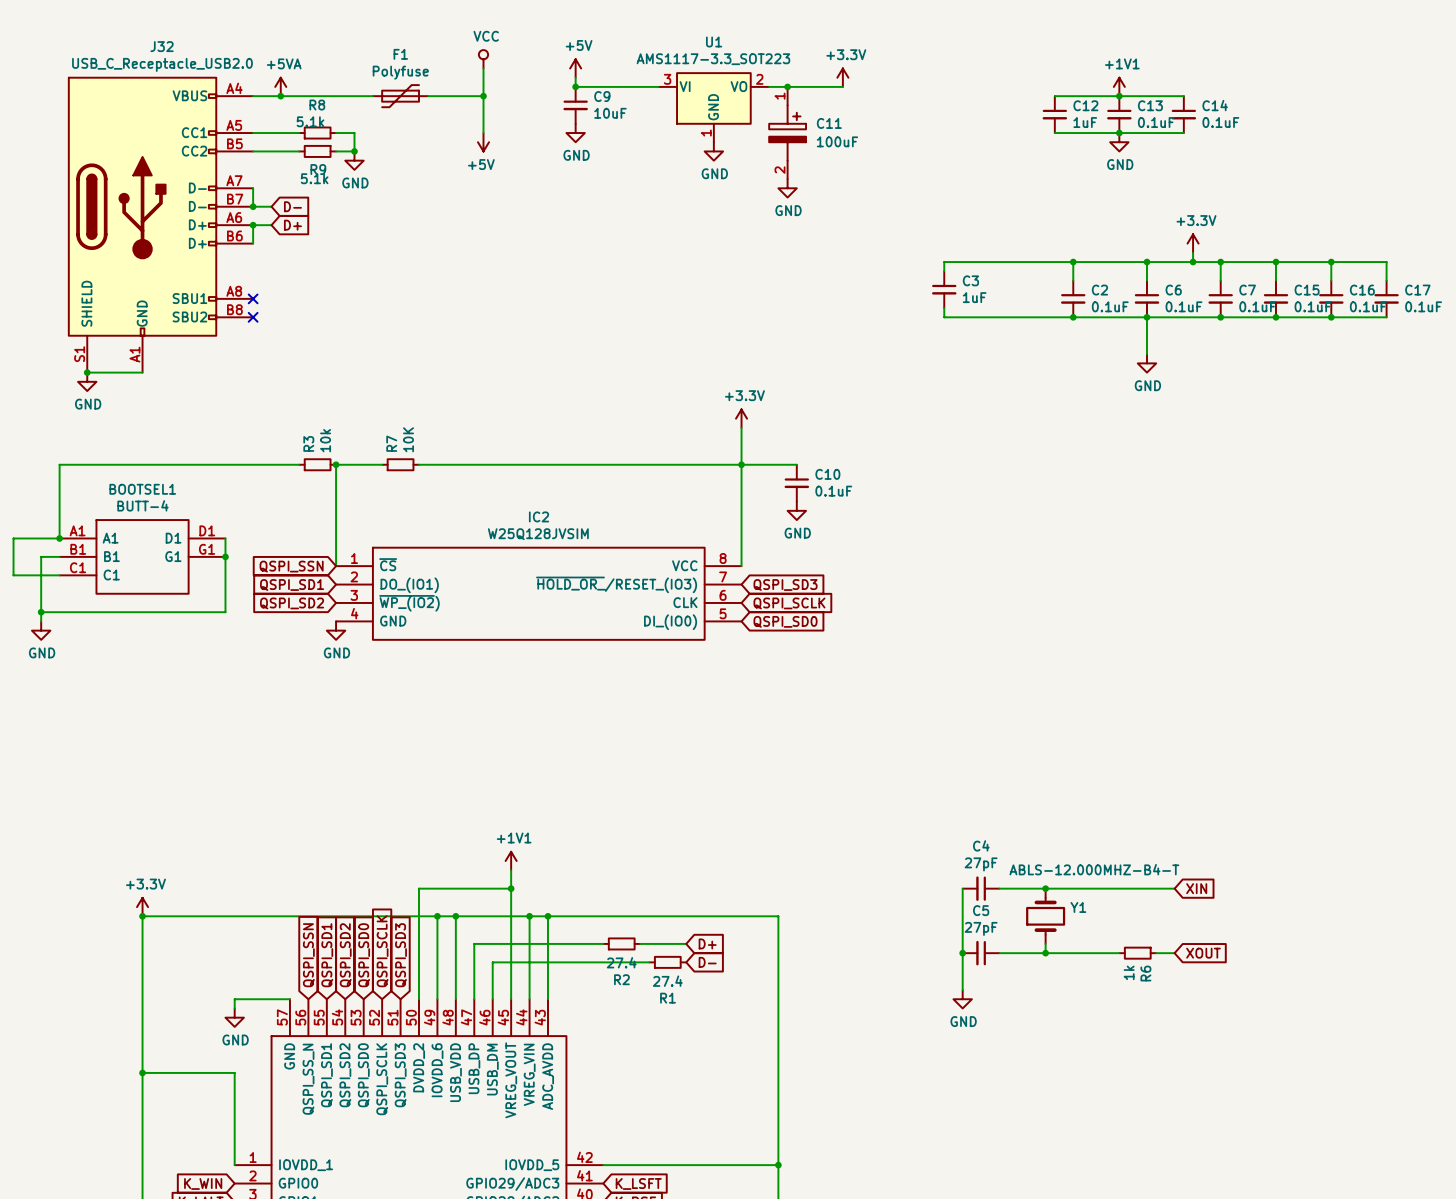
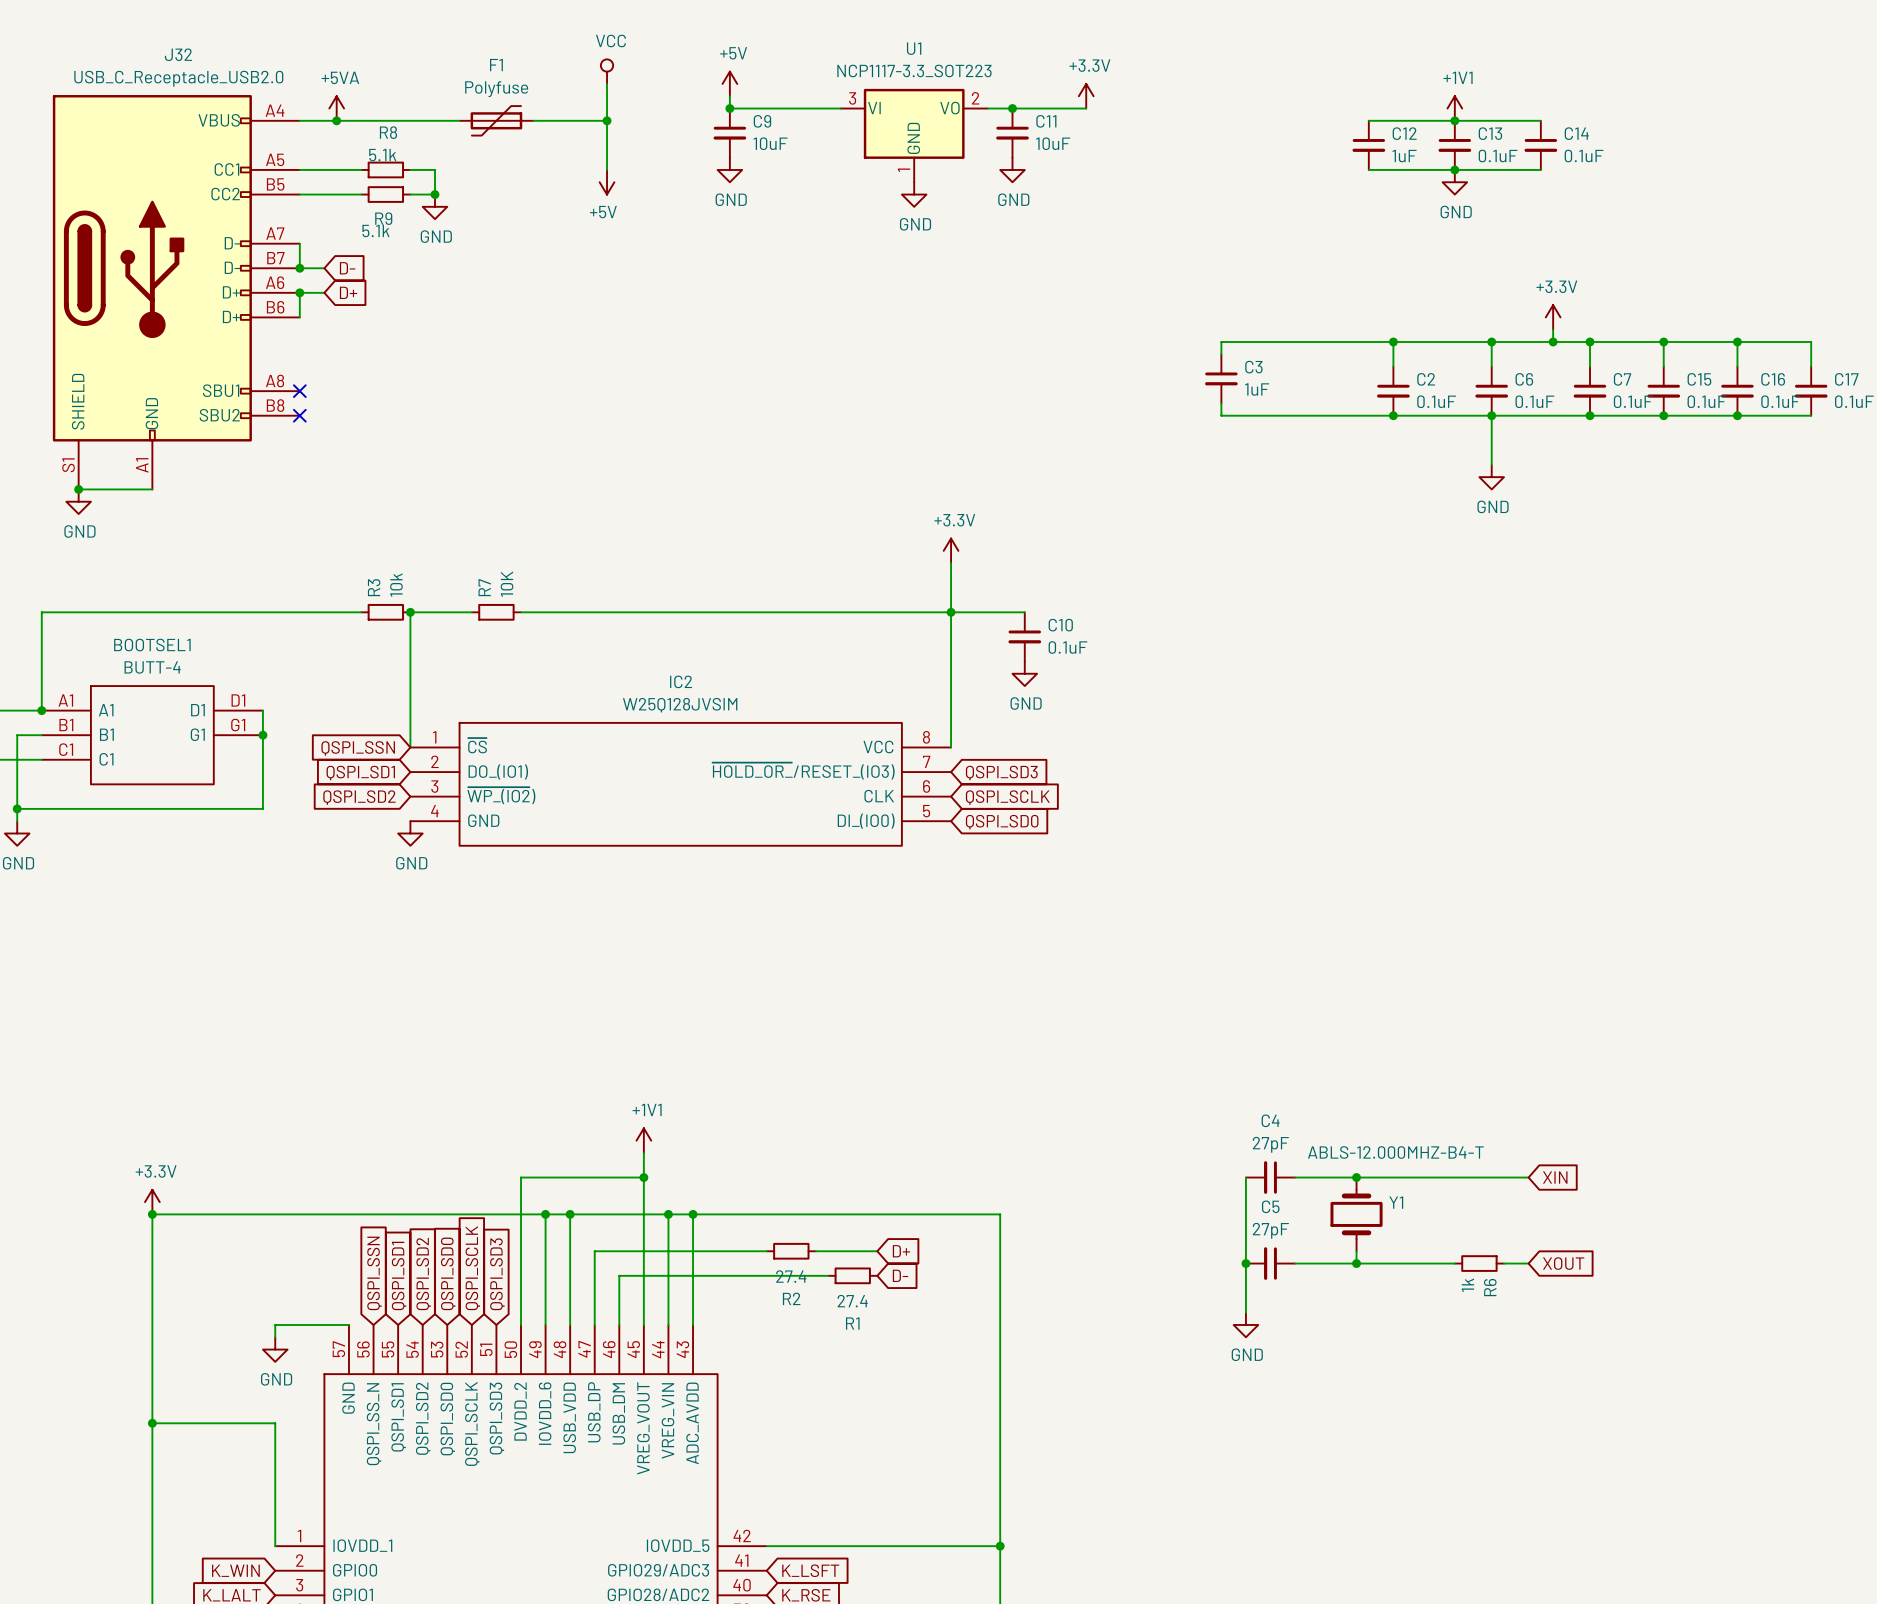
U1 value: AMS1117-3.3_SOT223 (713, 59) -> NCP1117-3.3_SOT223 (914, 70)
C11 symbol: [768, 86, 807, 180] -> [996, 108, 1029, 158]
C11 value: 100uF (837, 141) -> 10uF (1053, 143)
power symbol position: GND (787, 188) -> GND (1012, 169)

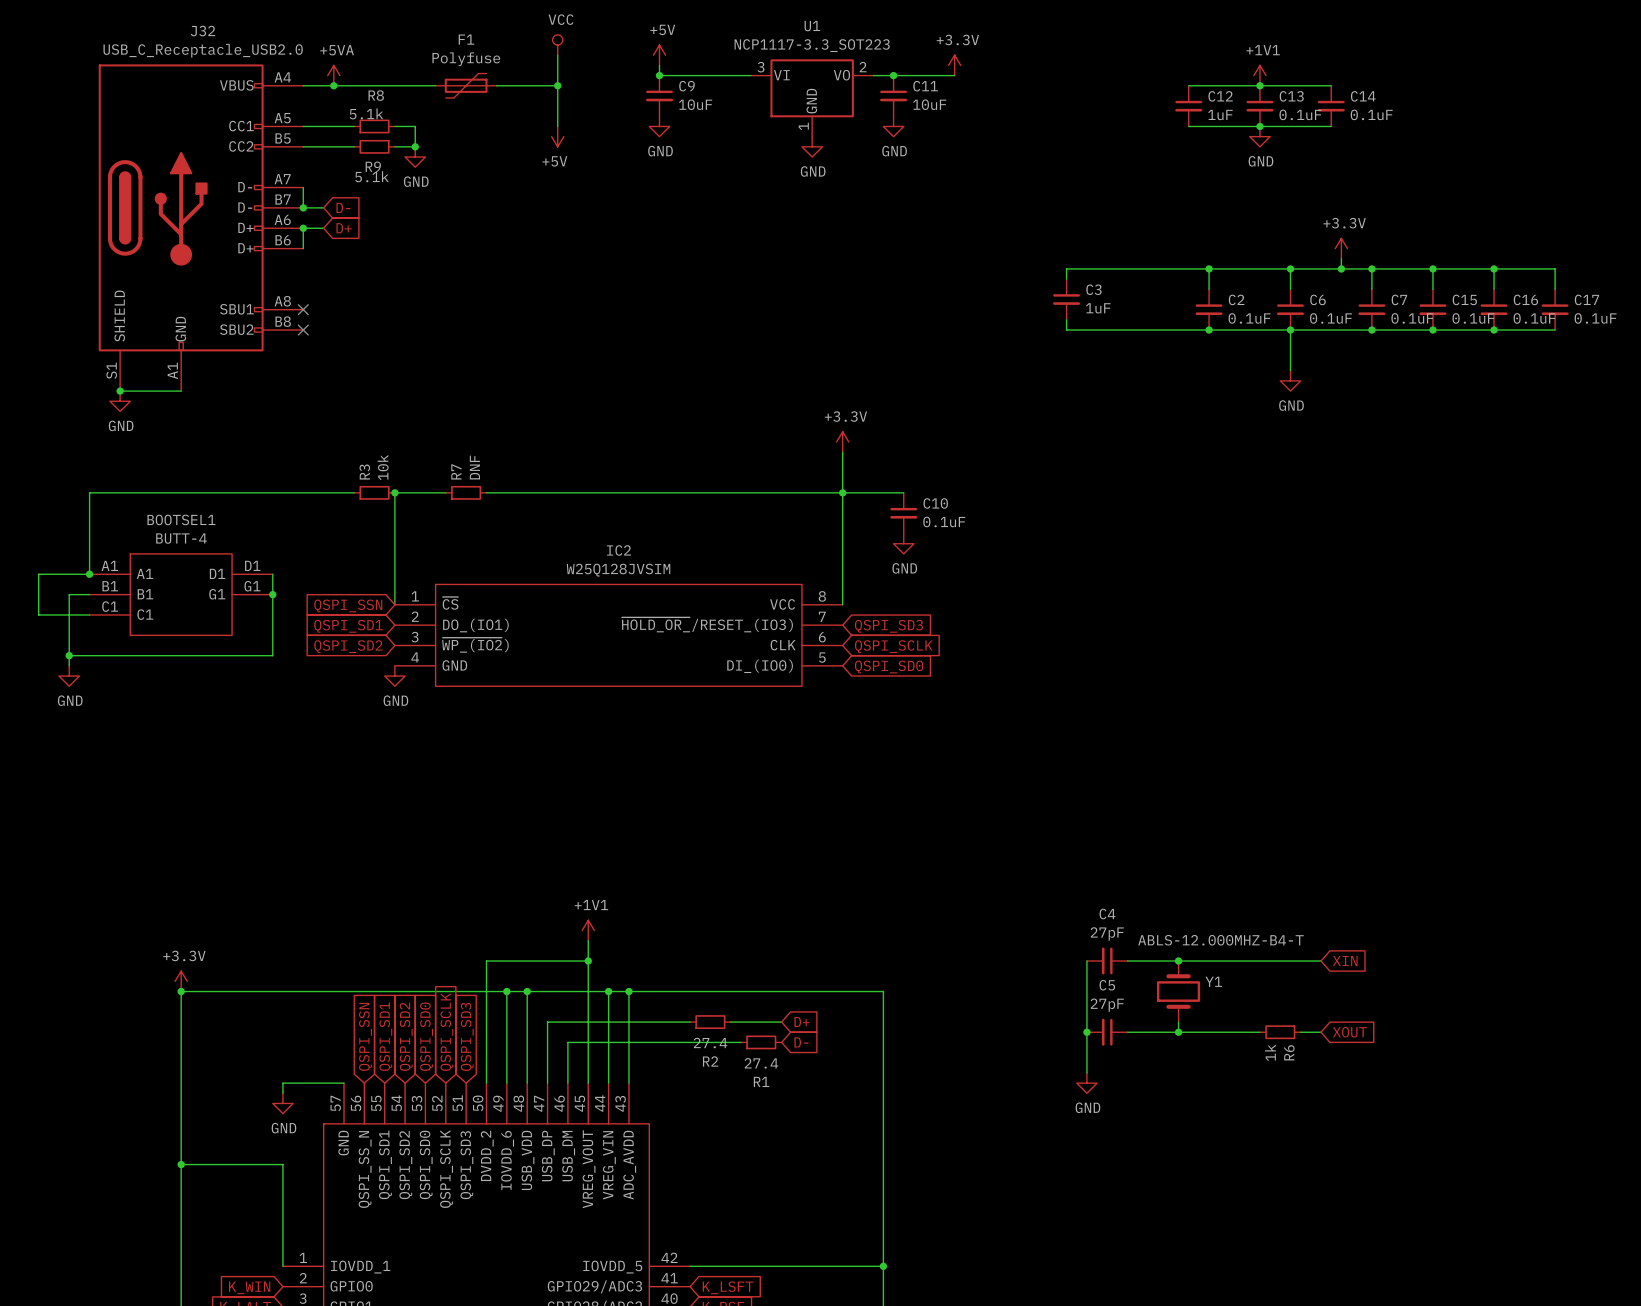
R7 value: 10K (507, 584) -> DNF (474, 467)

